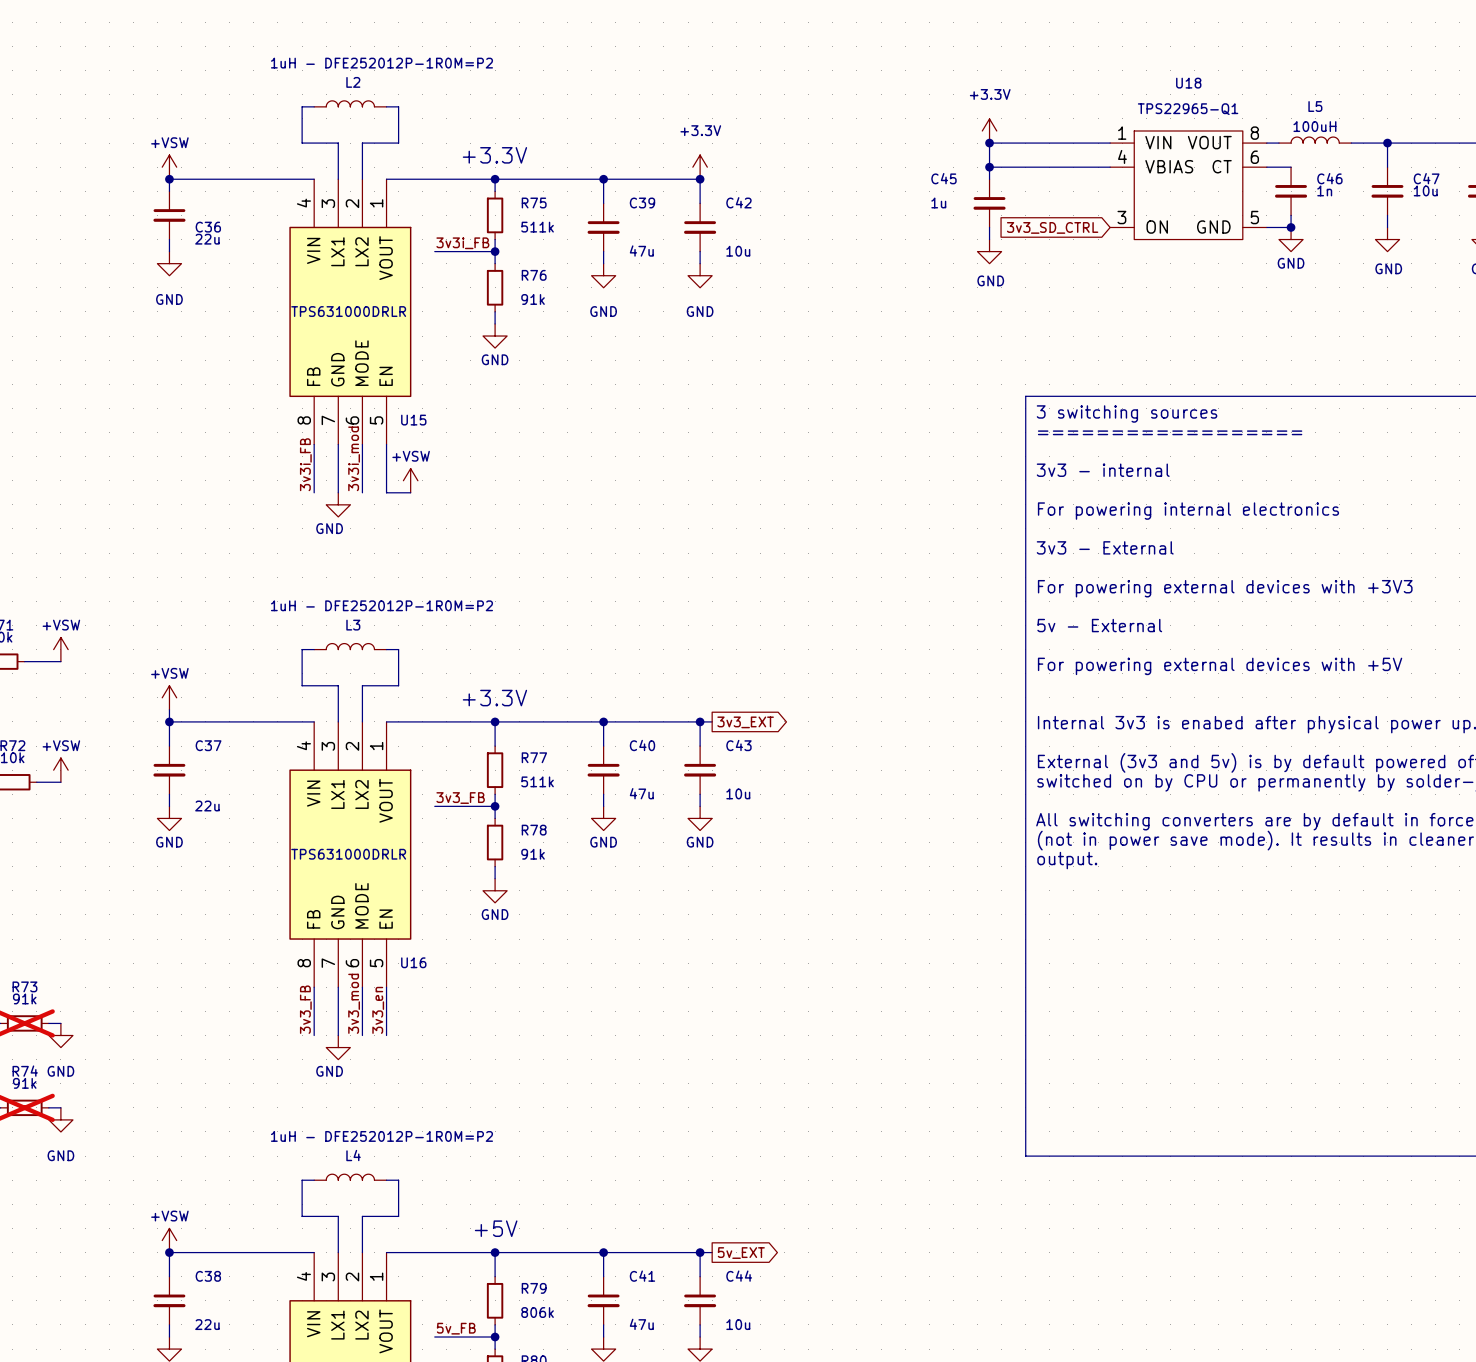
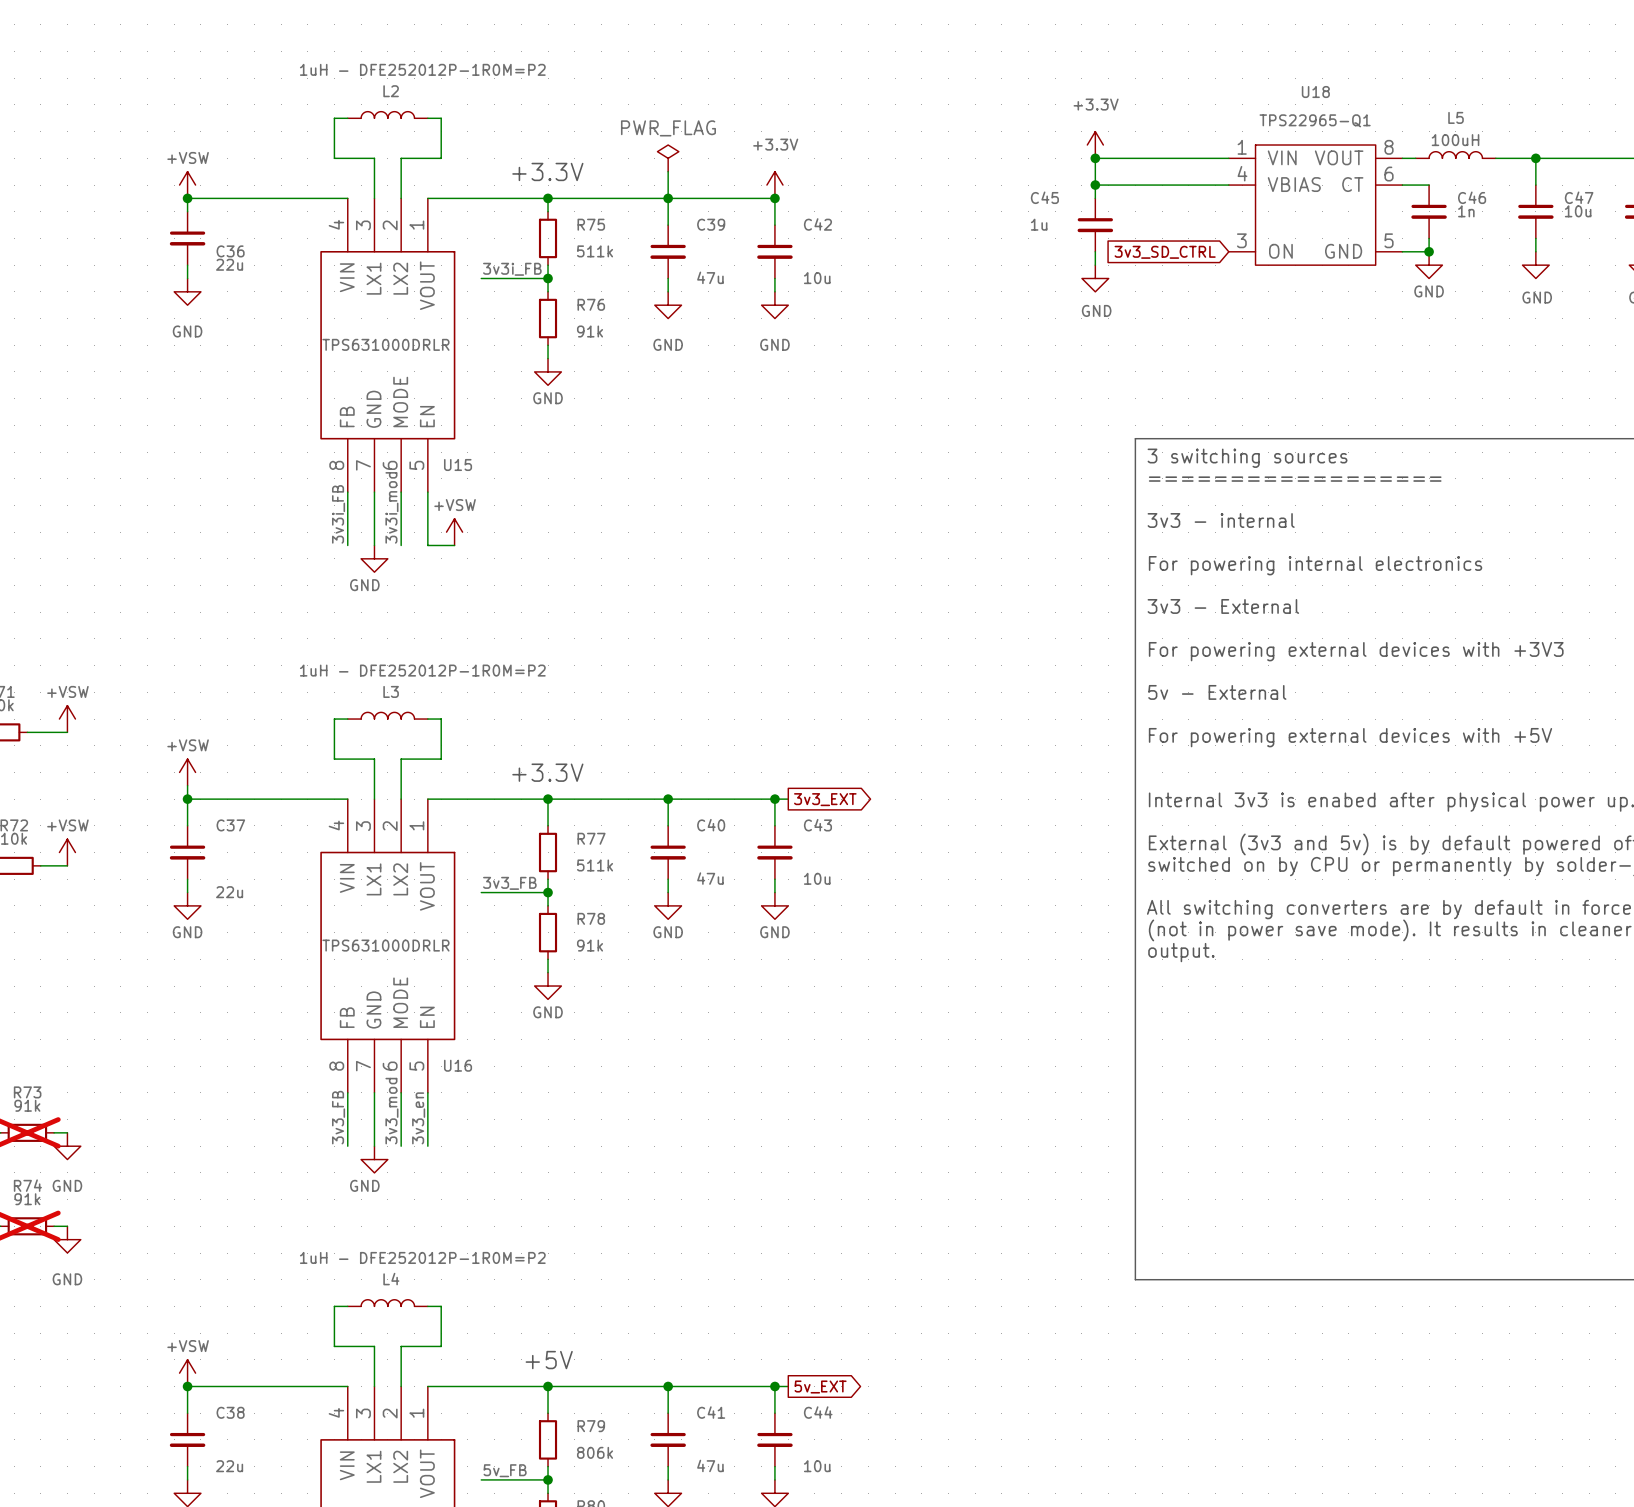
power symbol: none -> PWR_FLAG (668, 158)
wire: none -> (668, 171) (668, 198)
U15 symbol: [289, 179, 412, 445] -> [320, 198, 456, 493]
U16 symbol: [289, 721, 412, 988] -> [320, 799, 456, 1093]

